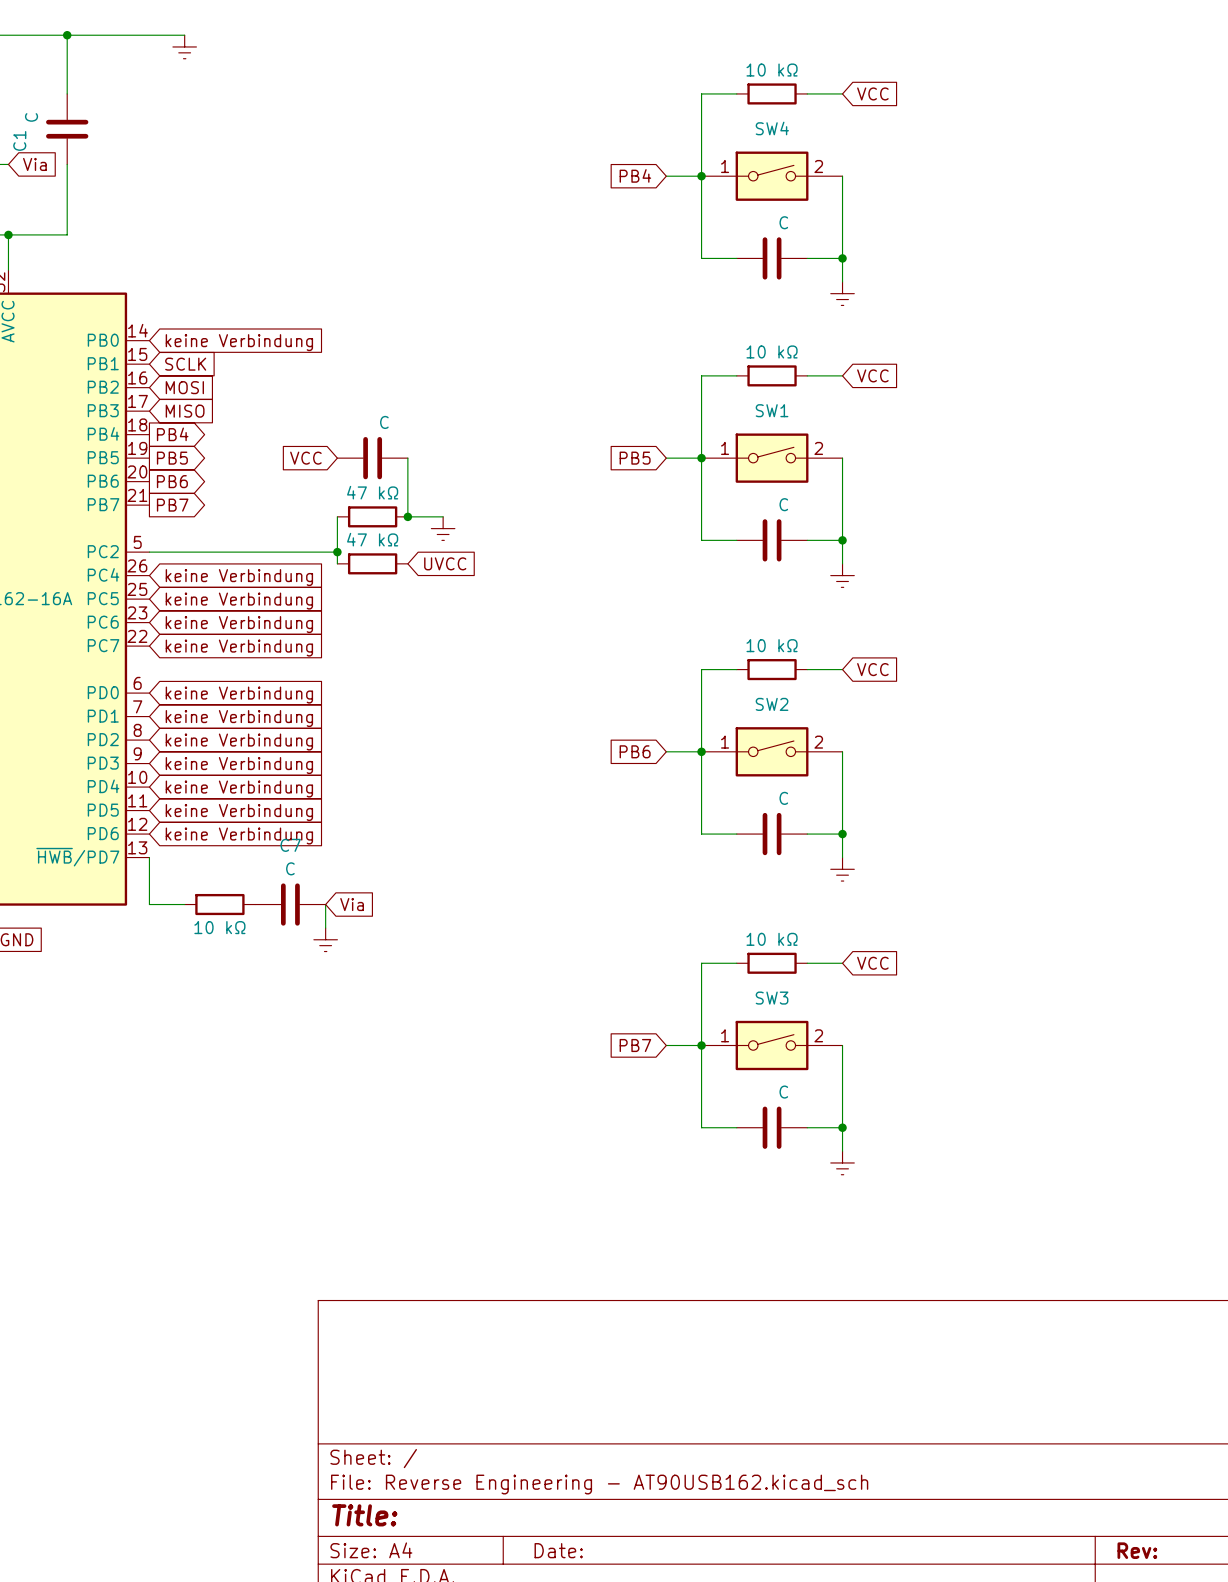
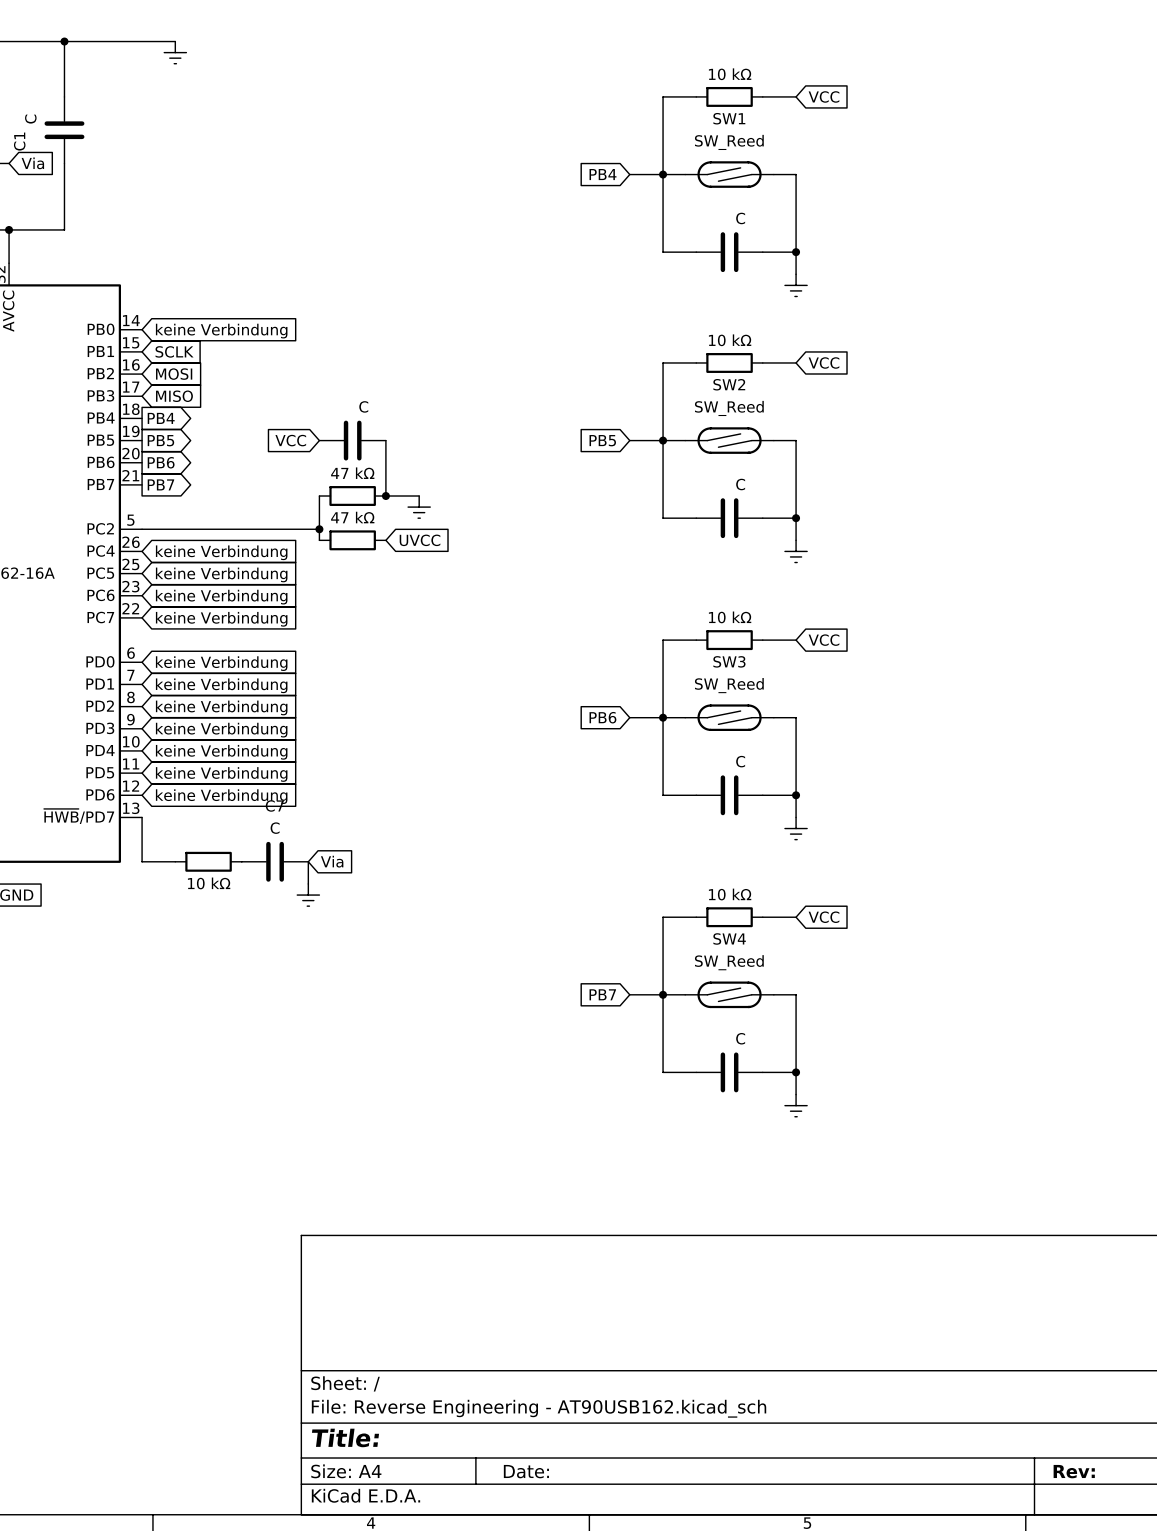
SW1 value: none -> SW_Reed (729, 142)
SW4 symbol: [701, 151, 843, 201] -> [685, 981, 774, 1009]
SW2 value: none -> SW_Reed (729, 408)
SW1 symbol: [701, 433, 843, 483] -> [685, 161, 774, 188]
SW3 value: none -> SW_Reed (729, 685)
SW2 symbol: [701, 727, 843, 777] -> [685, 427, 774, 454]
SW4 value: none -> SW_Reed (729, 962)
SW3 symbol: [701, 1020, 843, 1071] -> [685, 704, 774, 731]

